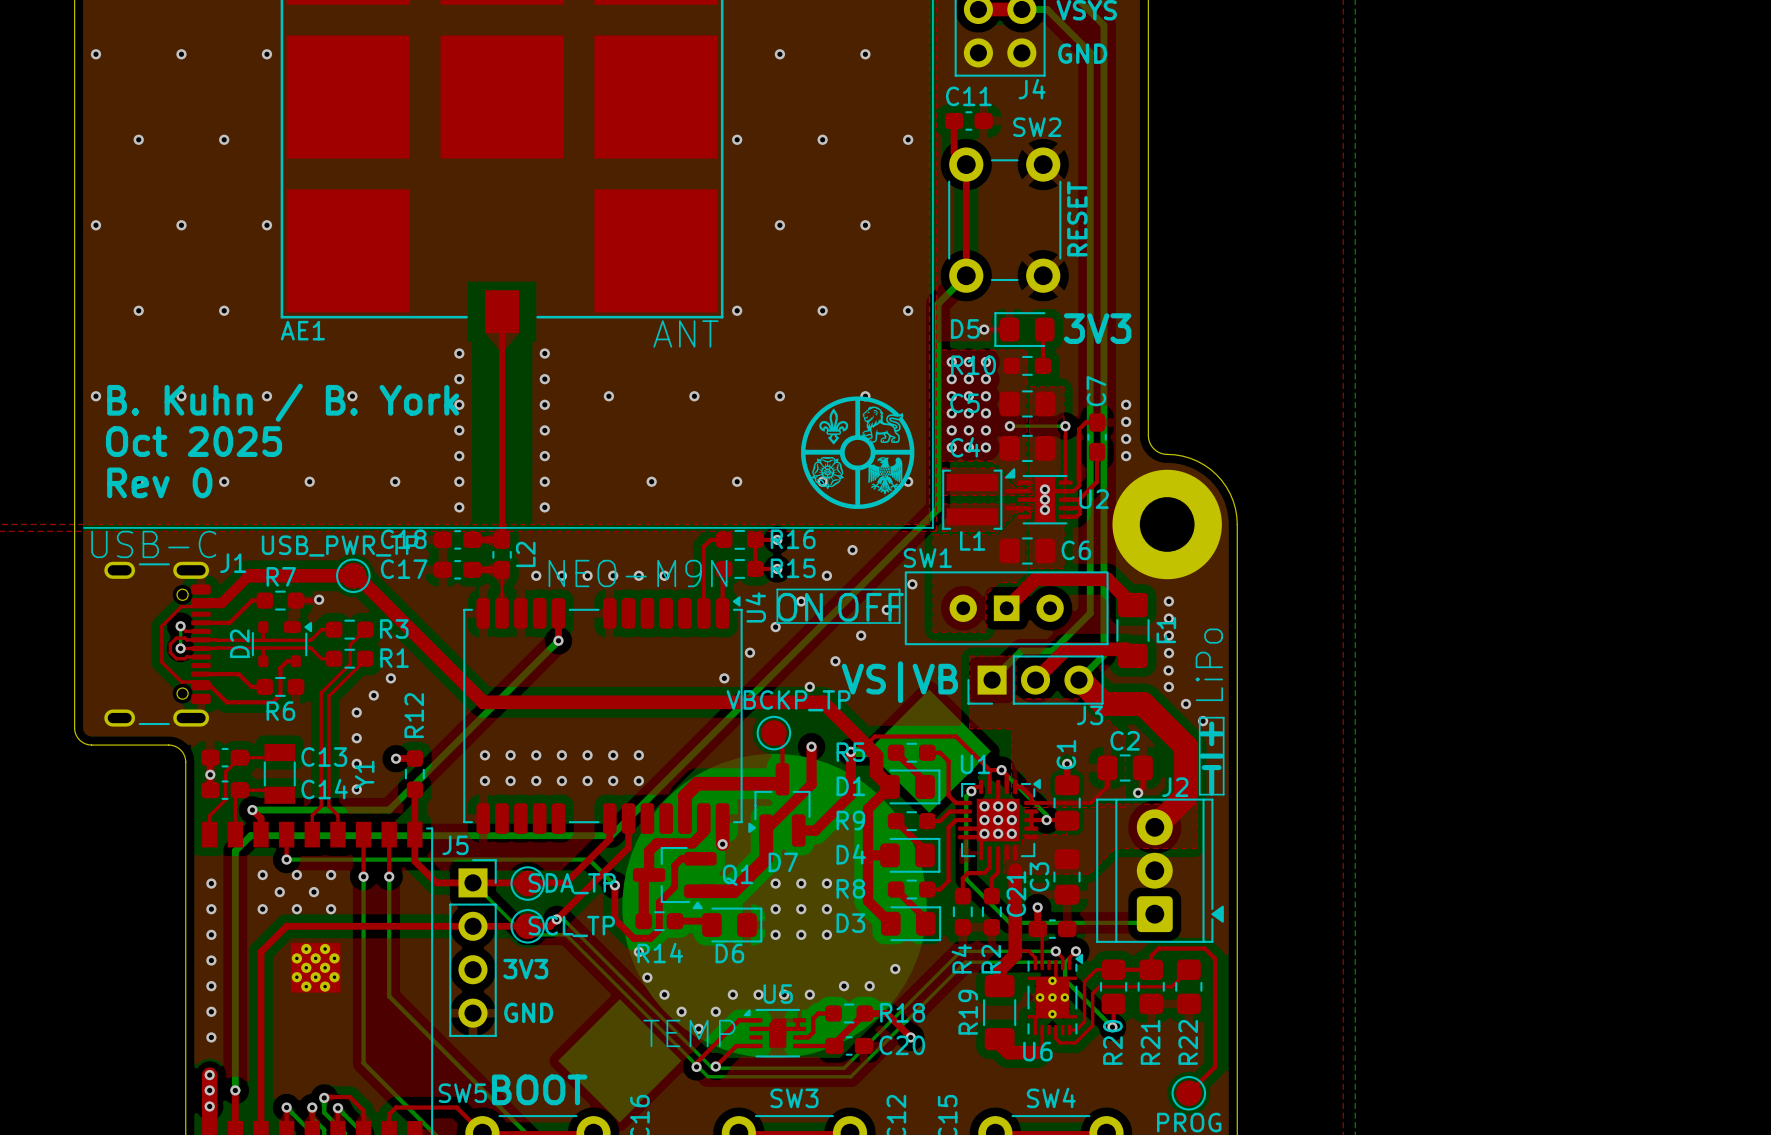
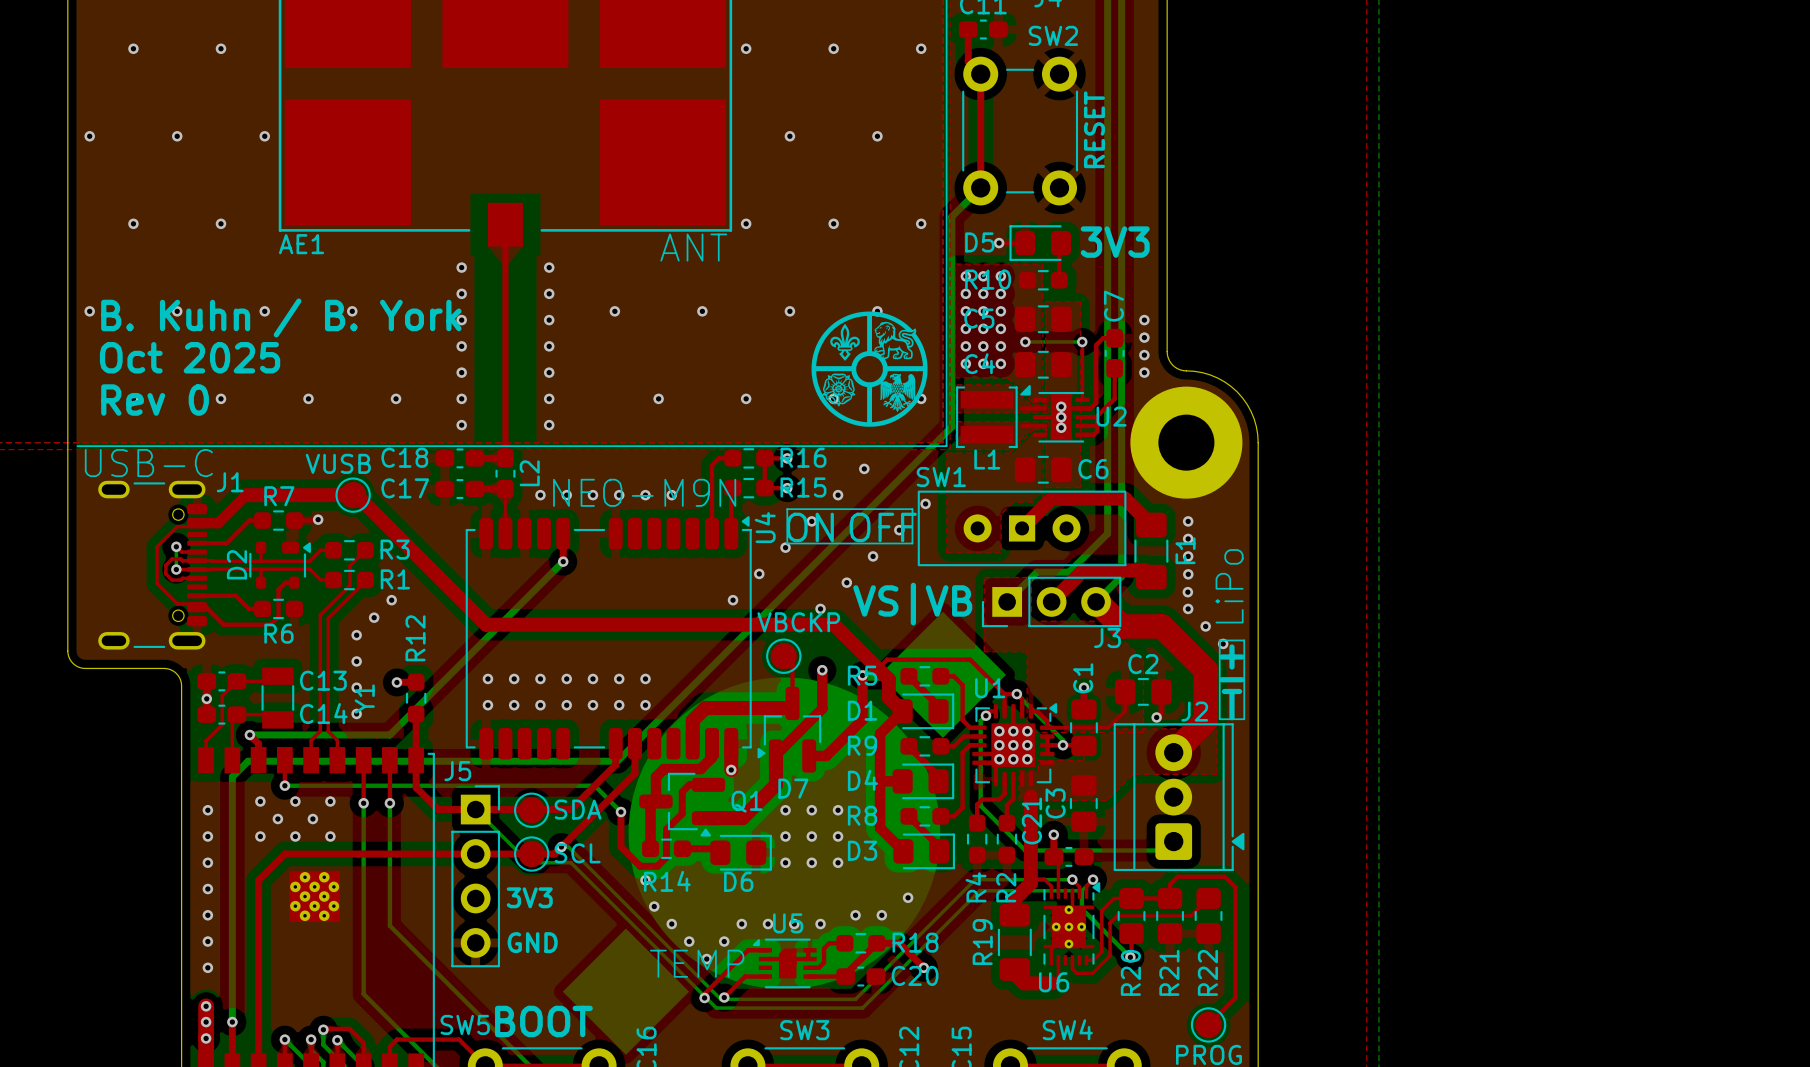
part value: USB_PWR_TP (340, 546) -> VUSB (338, 463)
part value: VBCKP_TP (788, 700) -> VBCKP (798, 622)
part value: SDA_TP (572, 883) -> SDA (578, 809)
part value: SCL_TP (571, 926) -> SCL (577, 853)

